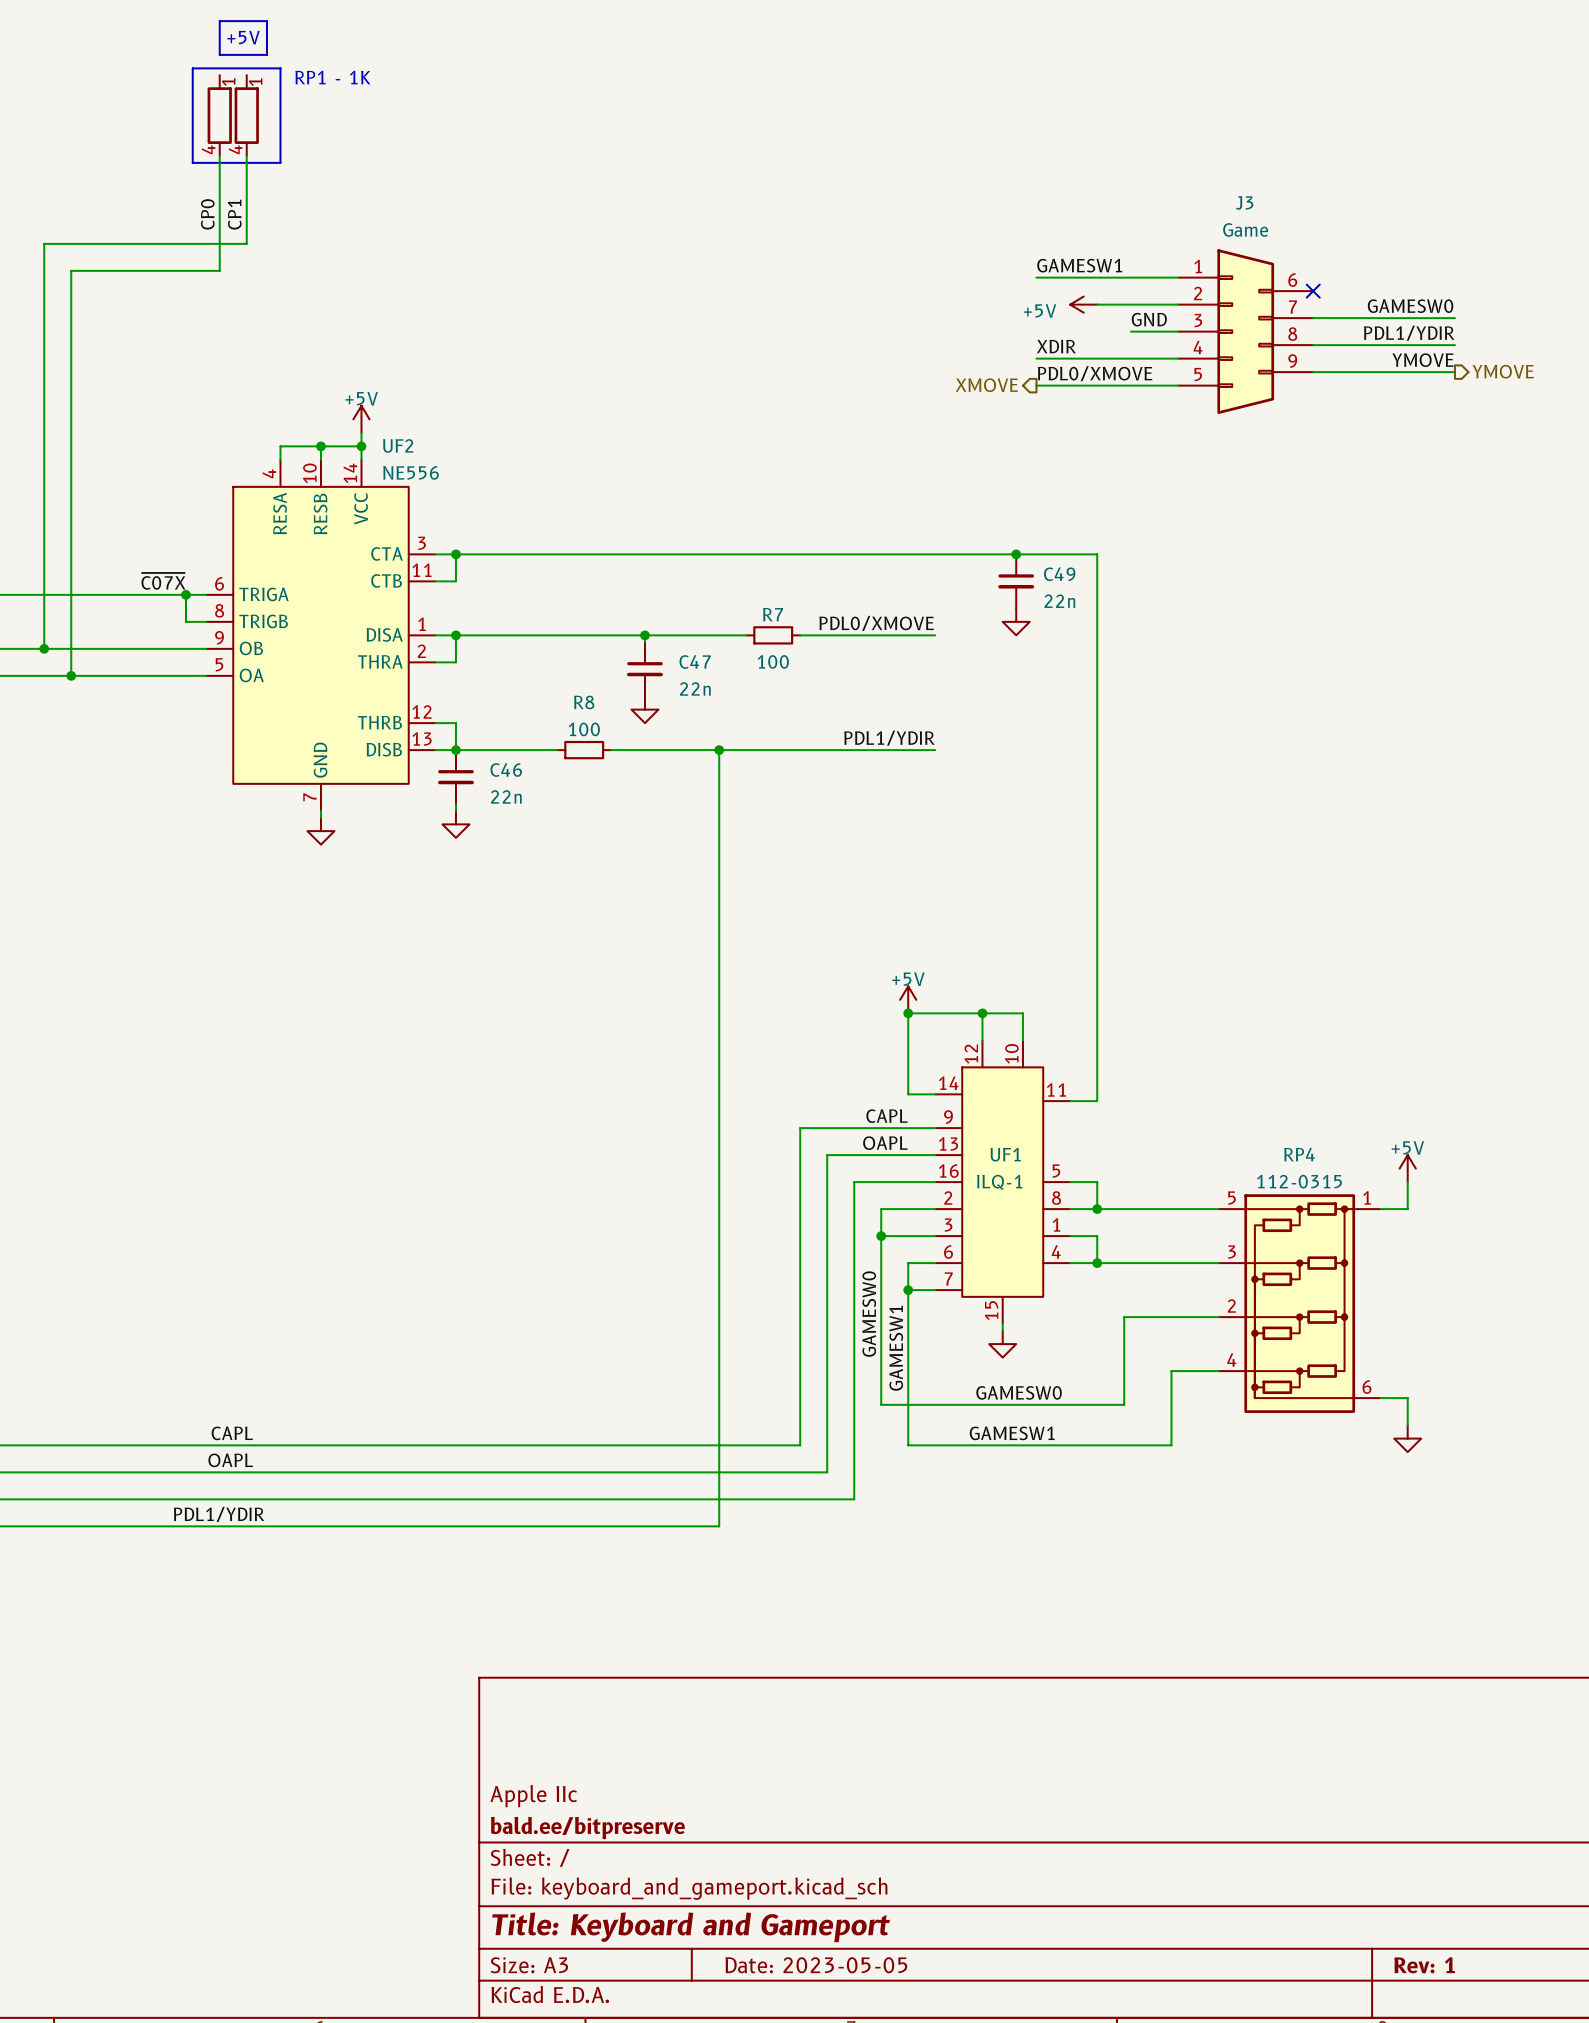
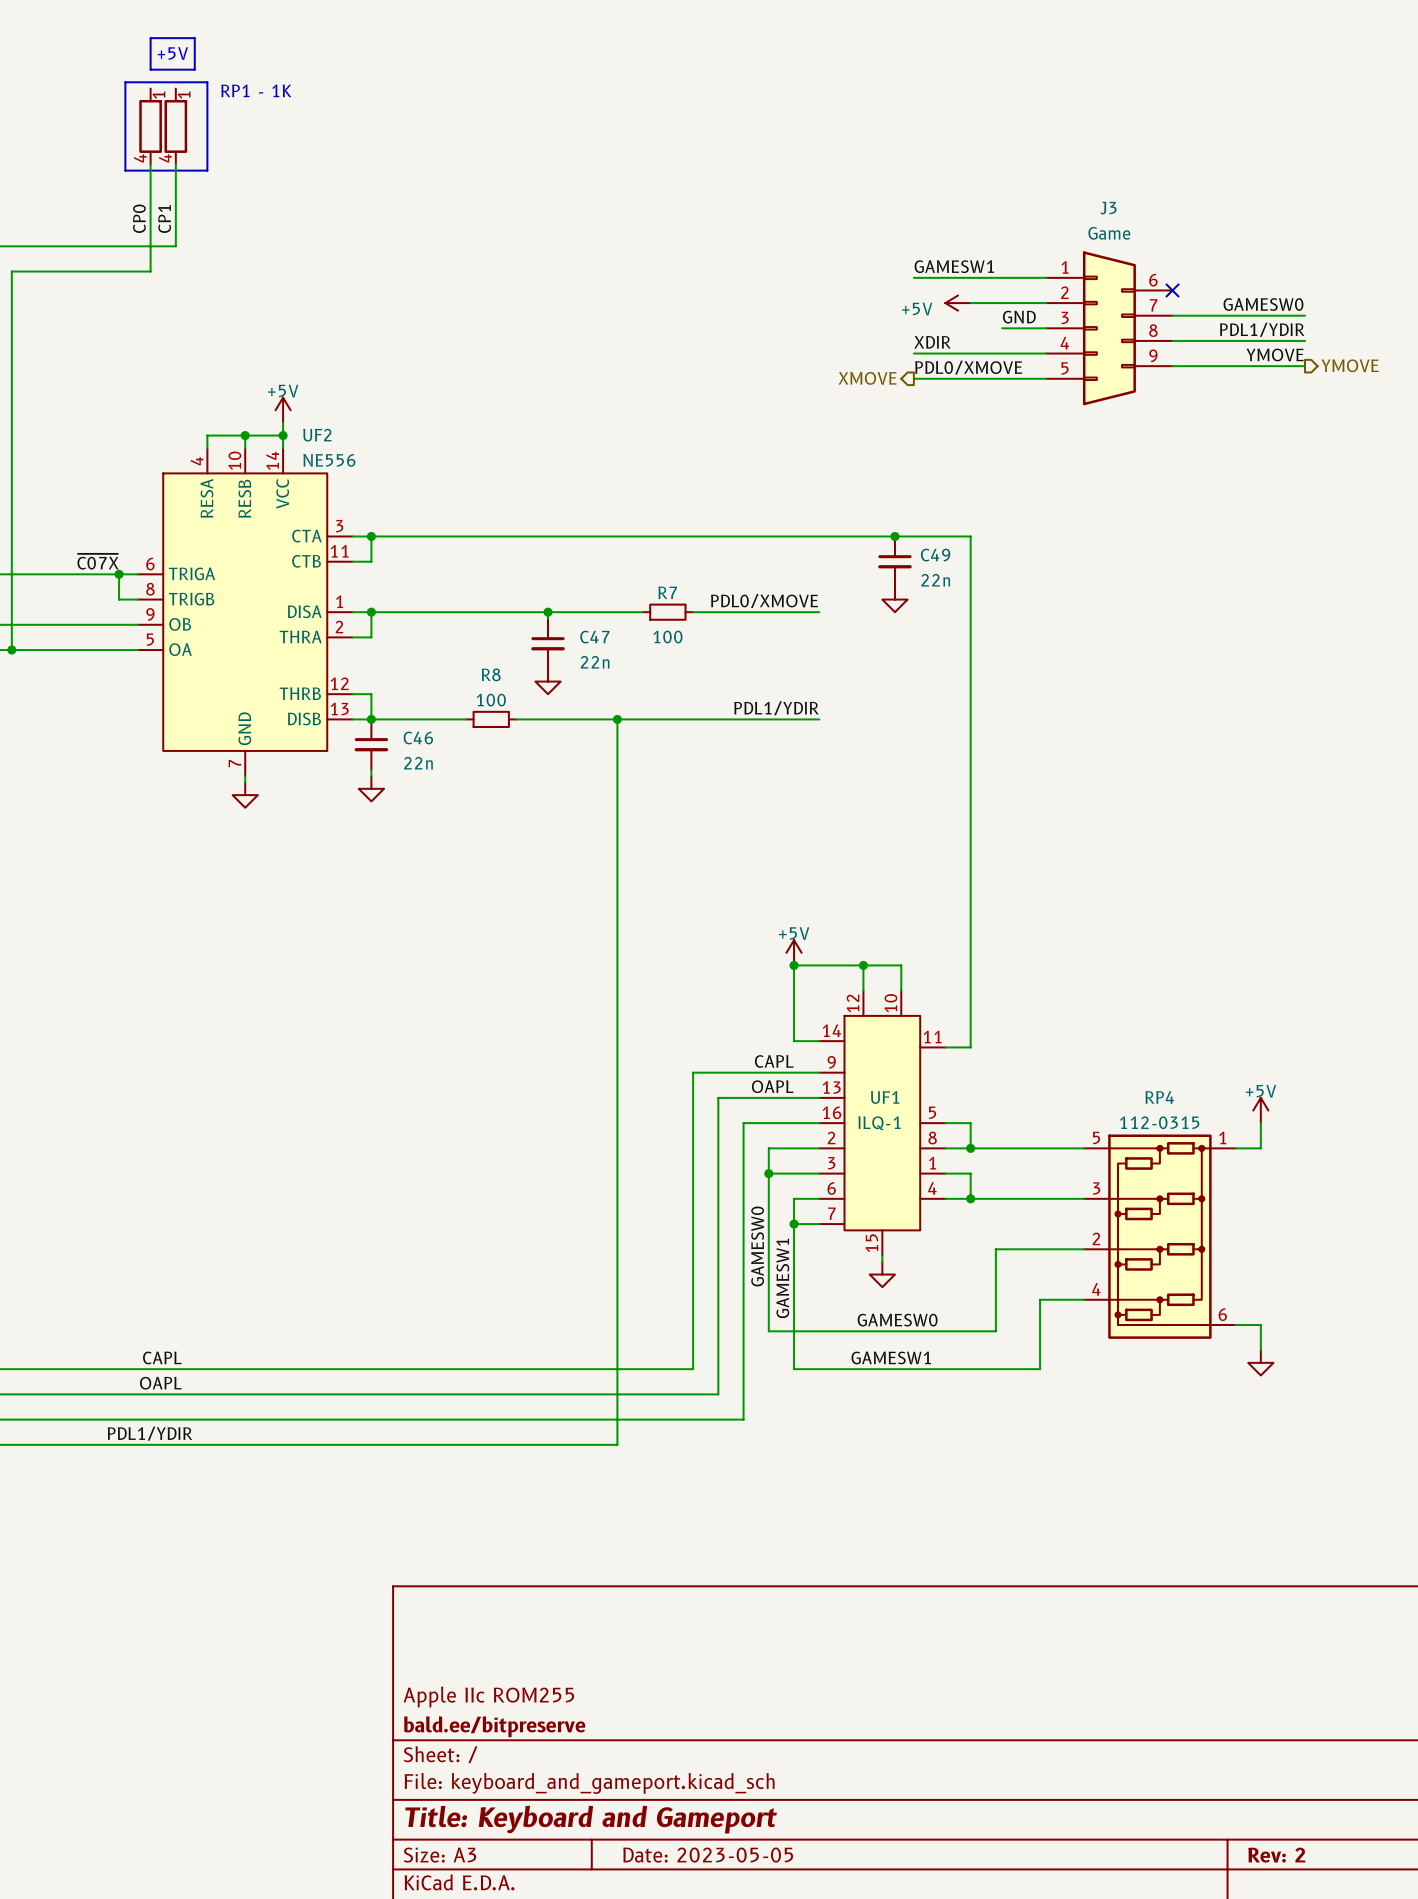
title block: Apple IIc (533, 1796) -> Apple IIc ROM255 (488, 1696)
title block: Rev: 1 (1424, 1965) -> Rev: 2 (1276, 1855)

